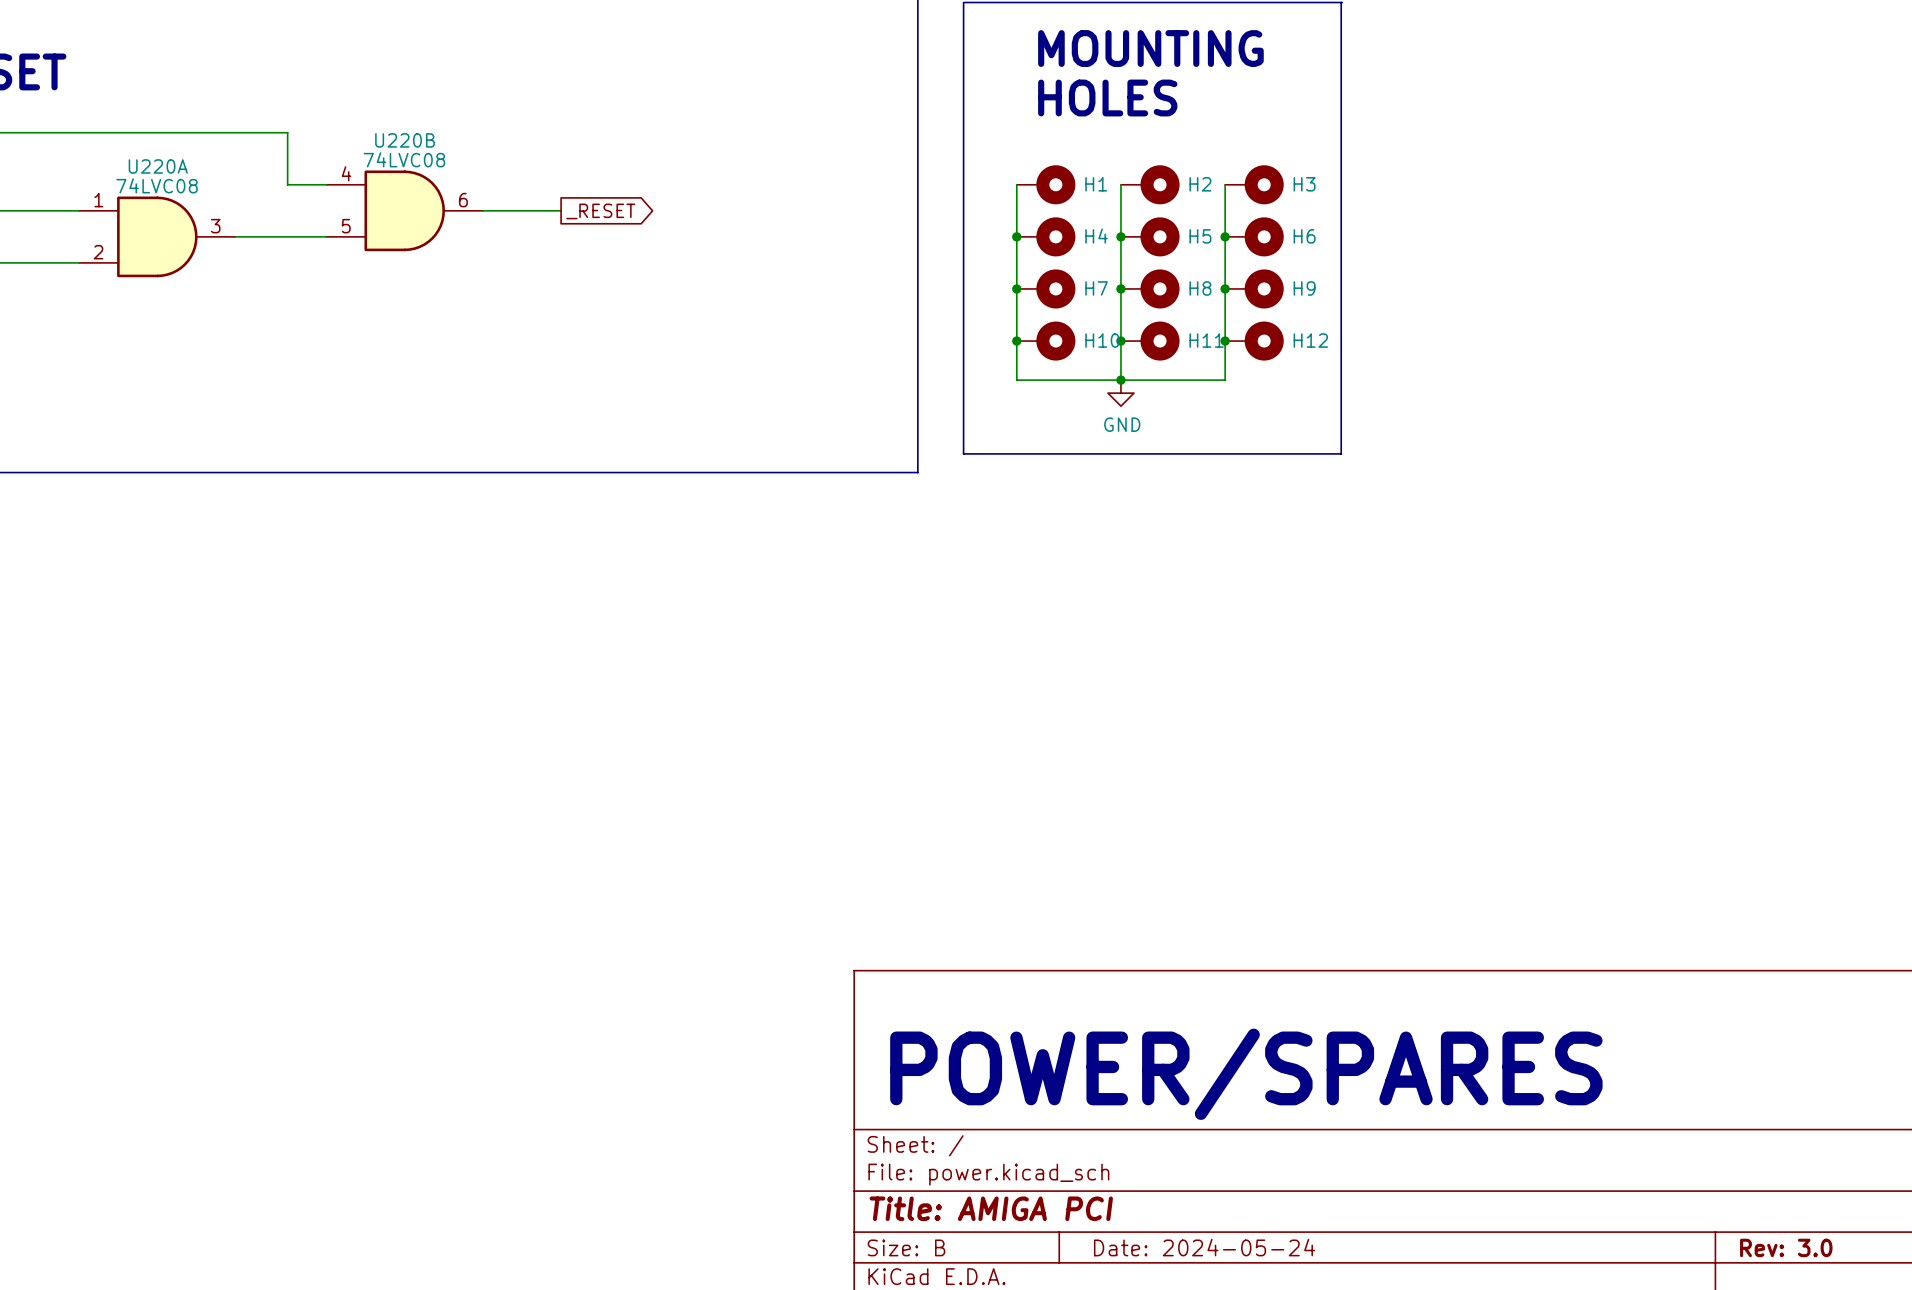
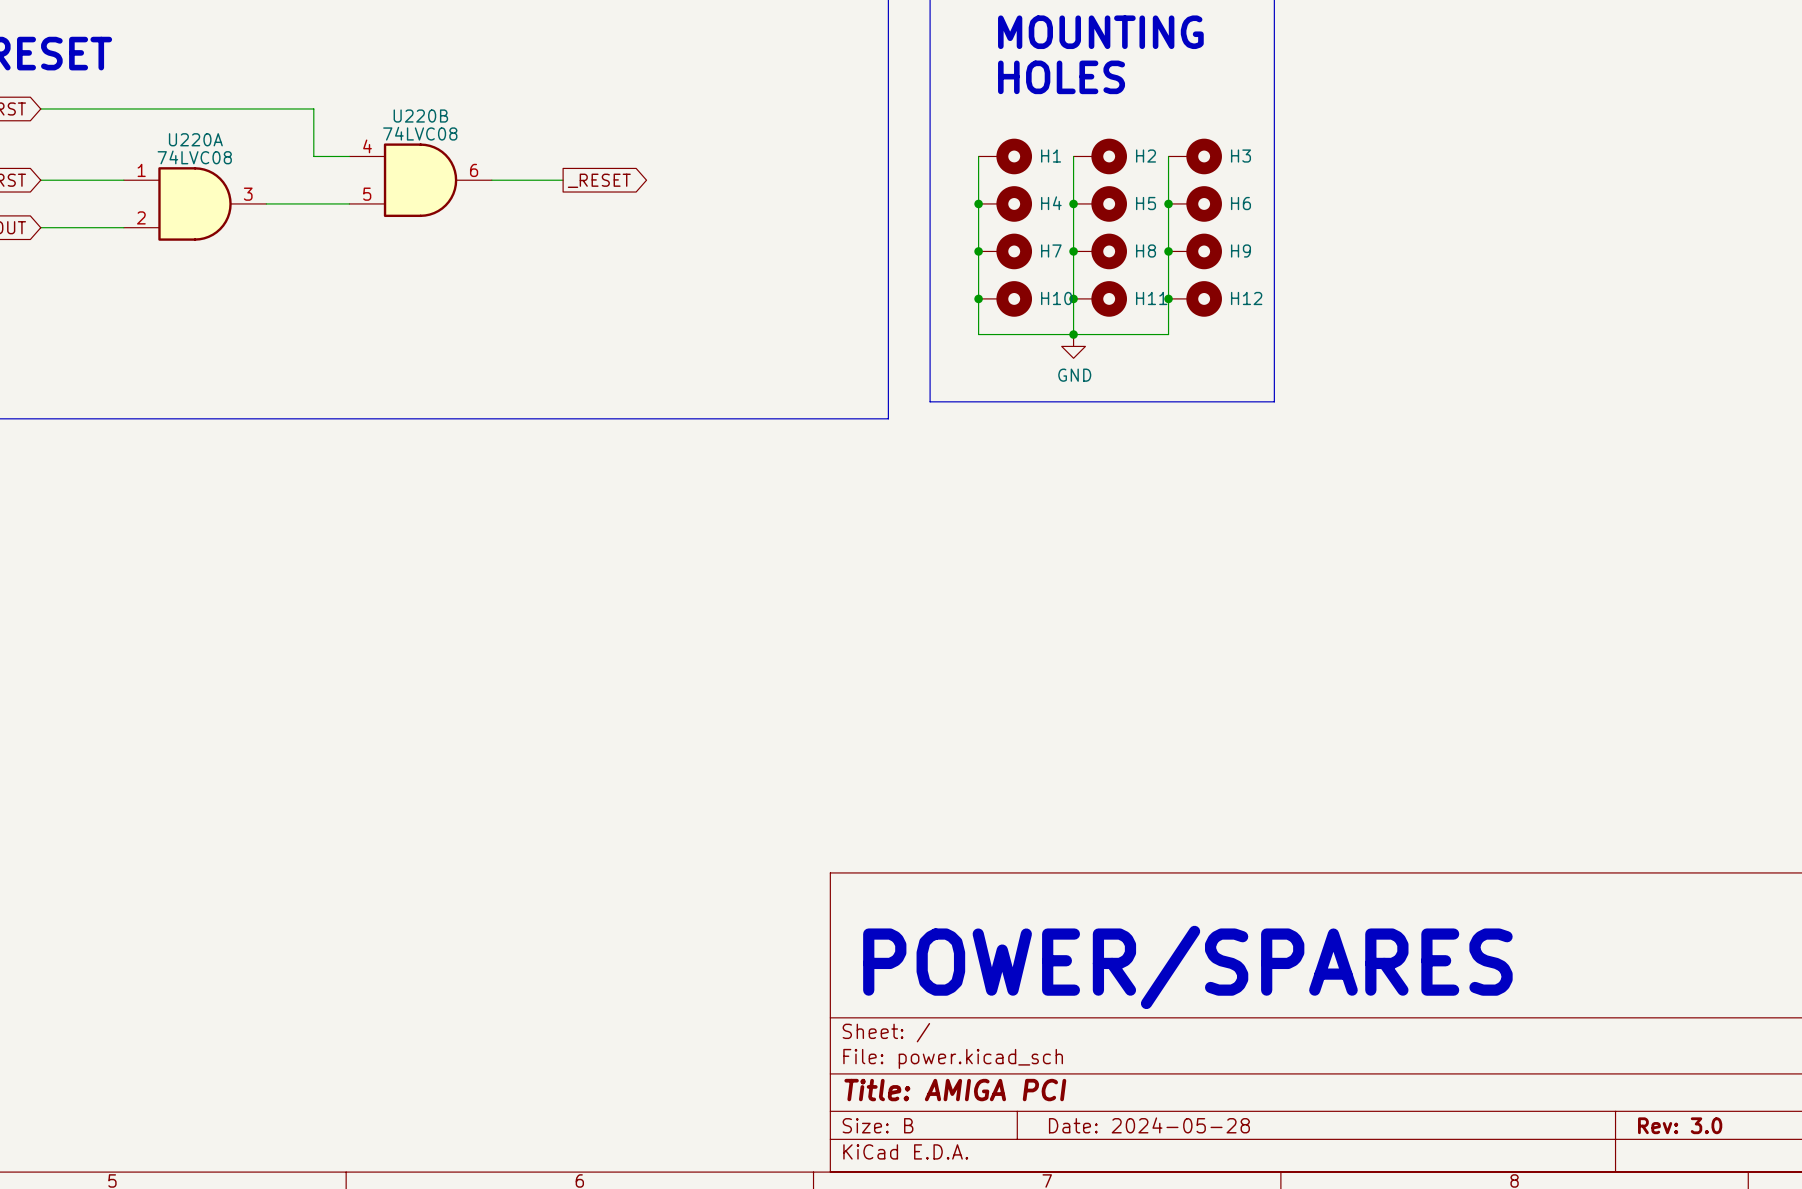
title block: Date: 2024-05-24 (1204, 1247) -> Date: 2024-05-28 (1149, 1125)

